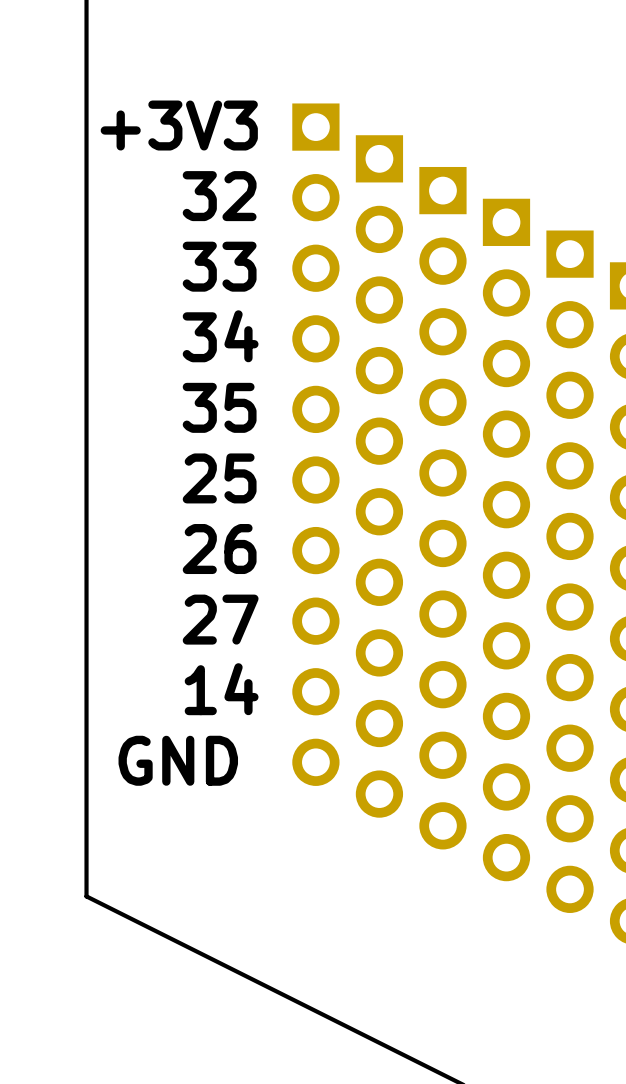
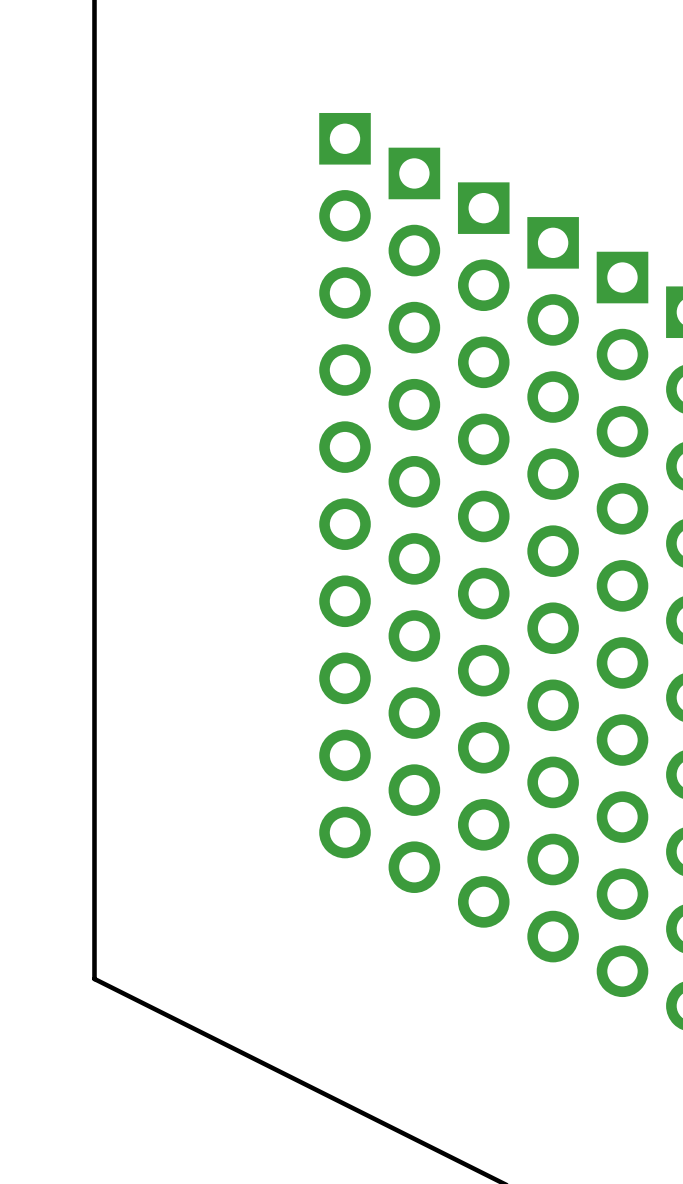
text: +3V3 (179, 125) -> none
text: 32 (219, 196) -> none
text: 33 (219, 266) -> none
text: 34 (220, 336) -> none
text: 35 (219, 407) -> none
text: 25 (219, 478) -> none
text: 26 (219, 549) -> none
text: 27 (220, 619) -> none
text: 14 (221, 689) -> none
text: GND (178, 760) -> none

